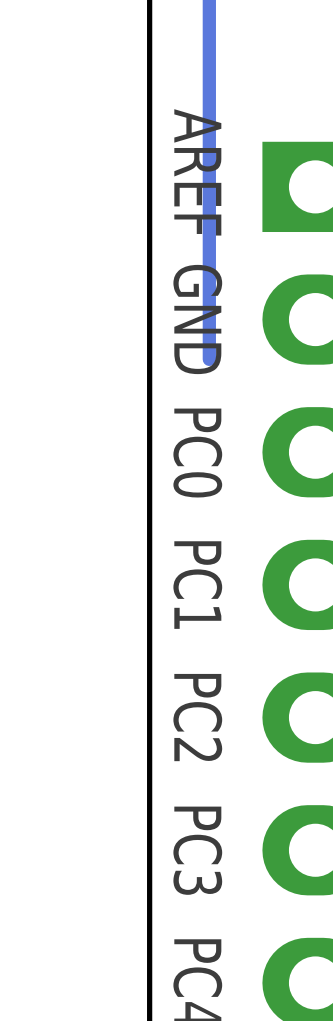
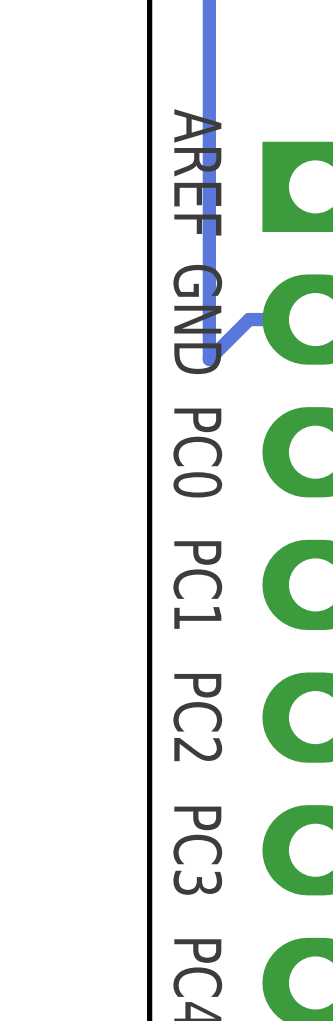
bottom track: none -> (315, 319) (249, 319) (209, 359)

